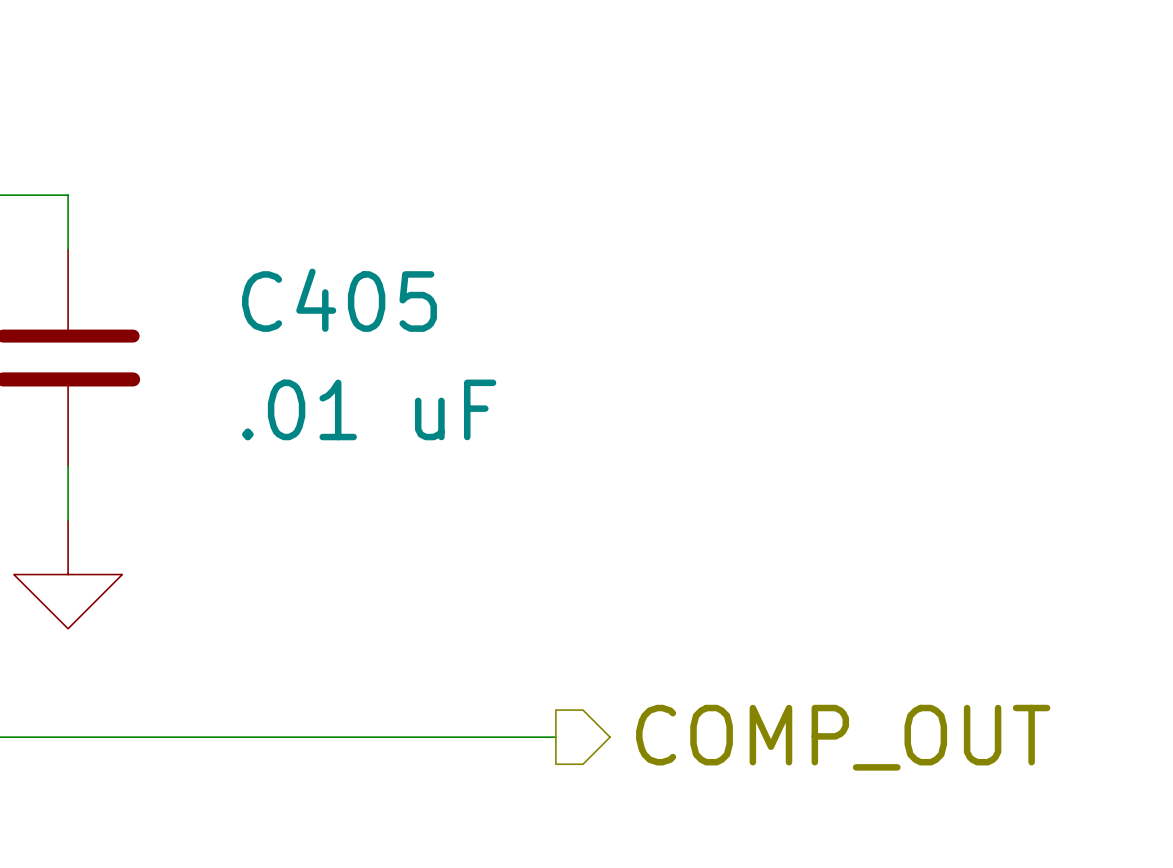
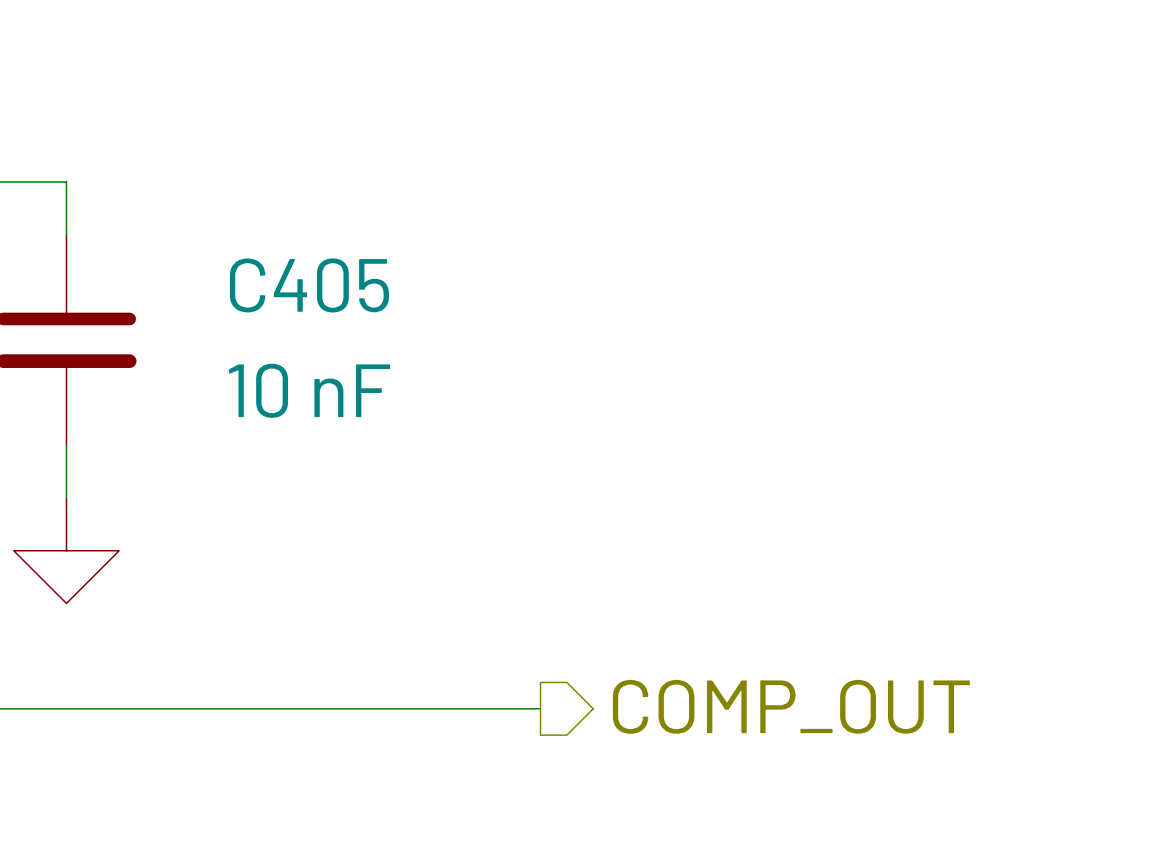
C405 value: .01 uF (369, 409) -> 10 nF (309, 390)

